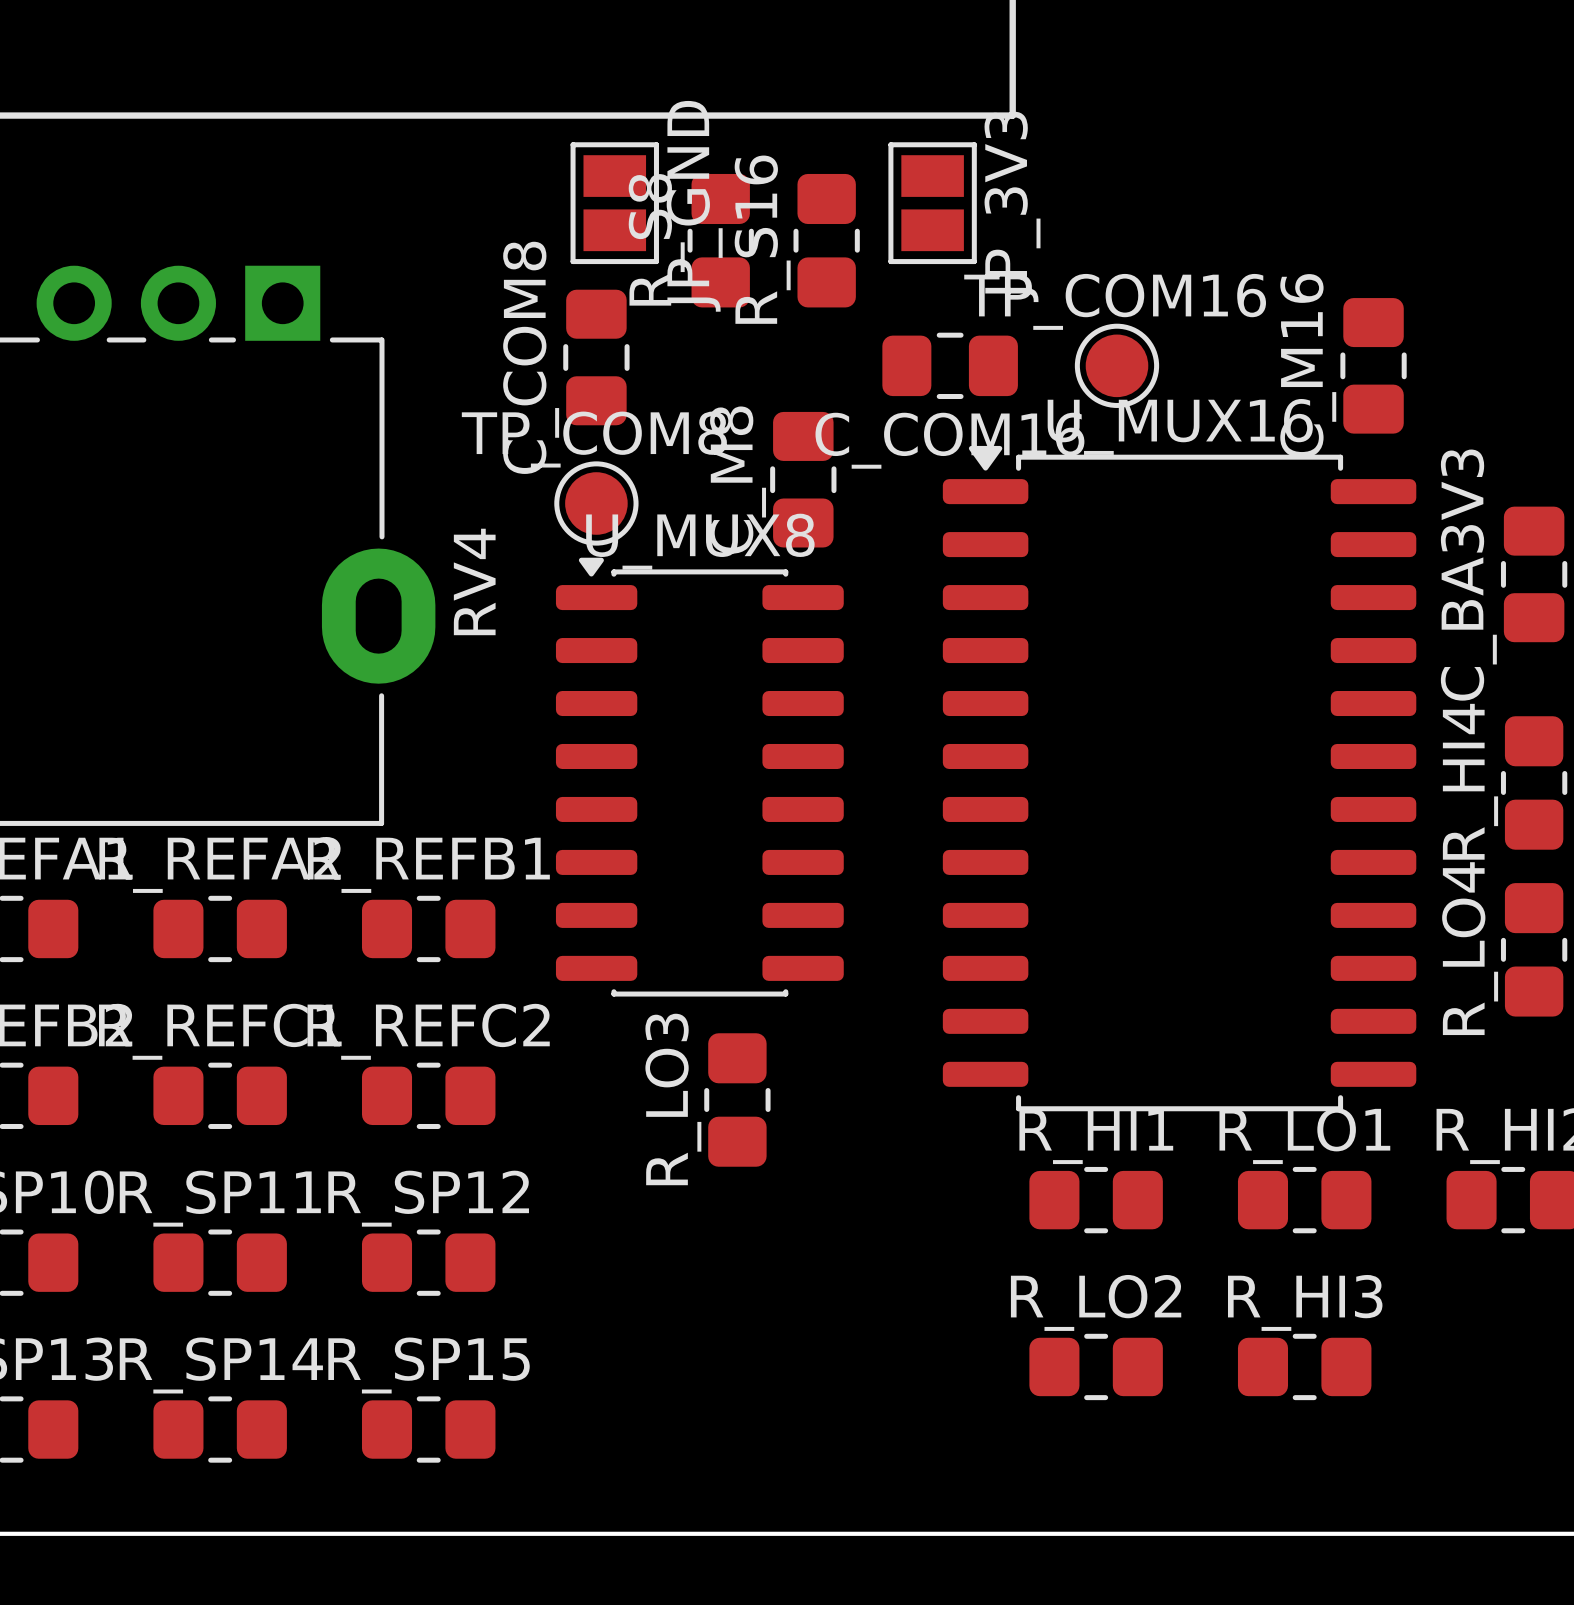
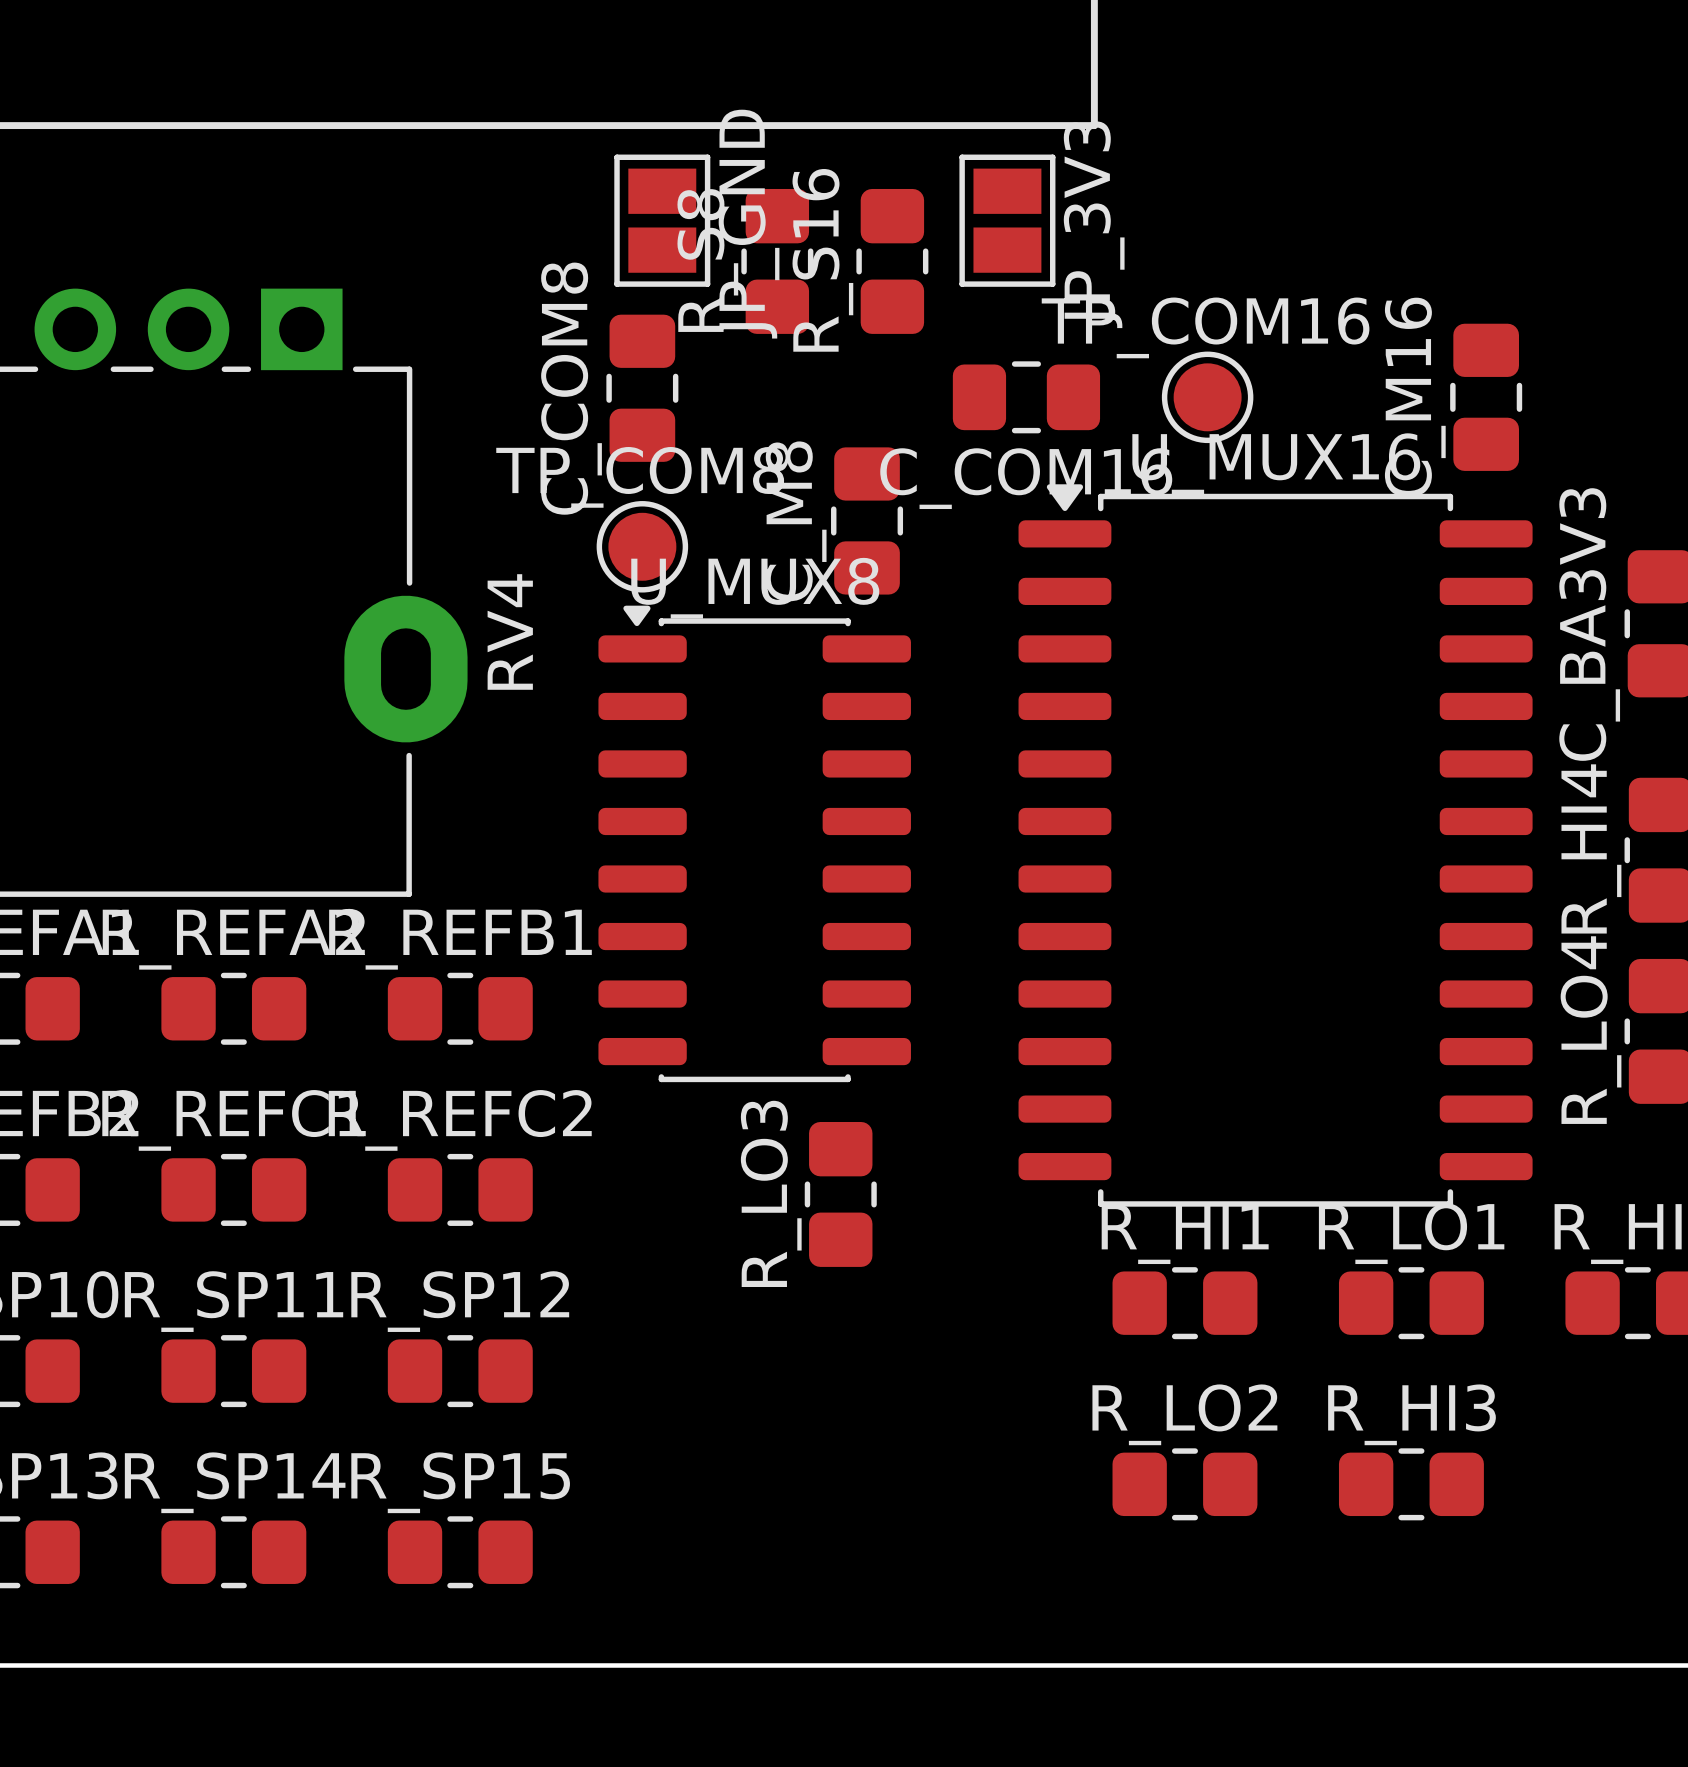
R_LO3 position: (737, 1099) -> (840, 1194)

